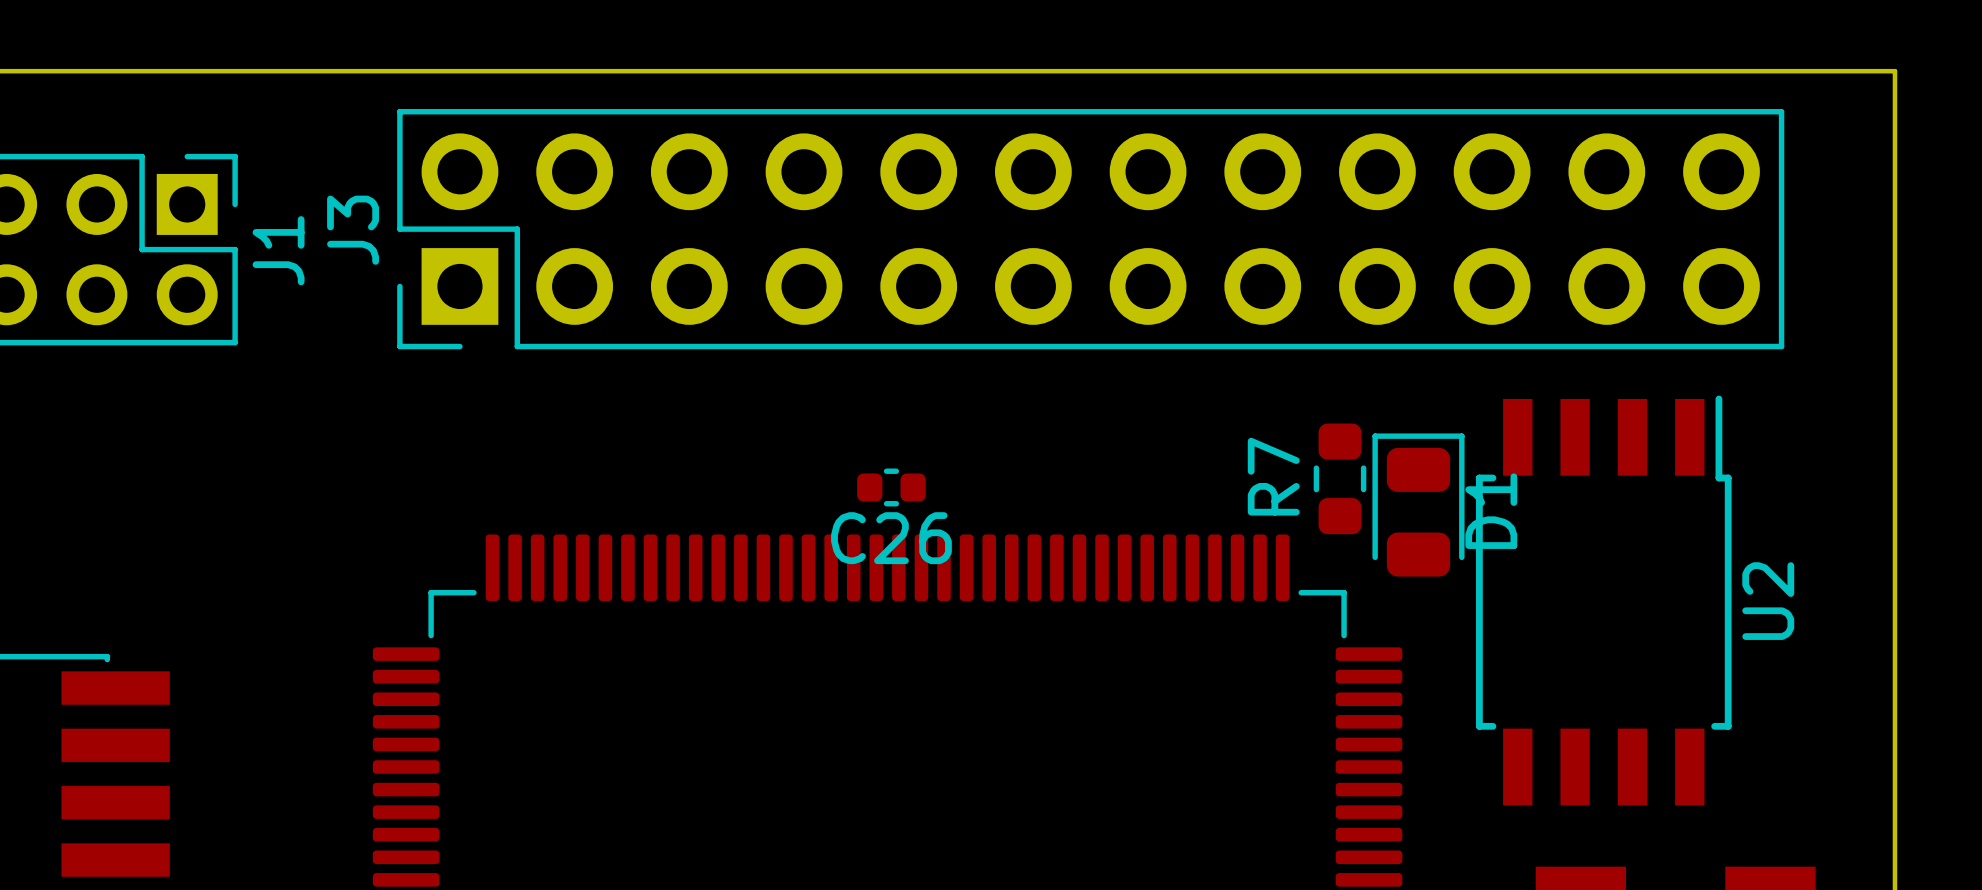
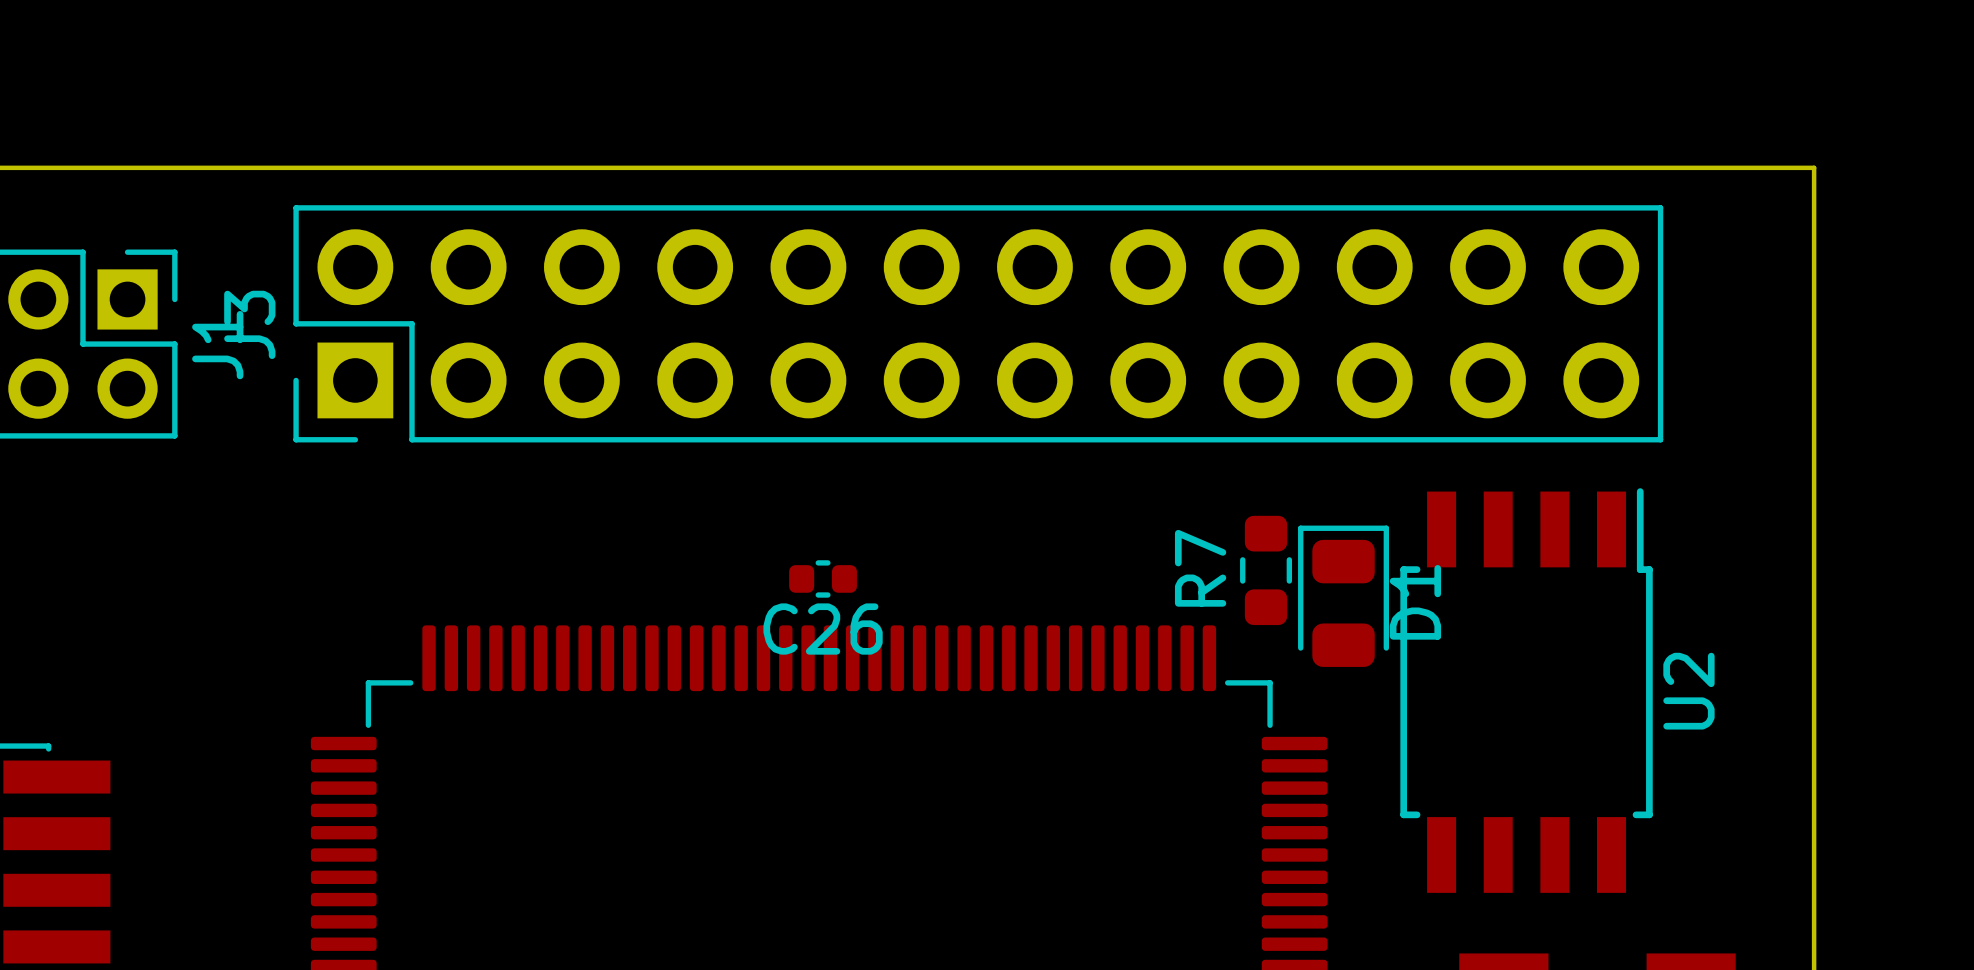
J3 position: (1090, 229) -> (978, 323)

